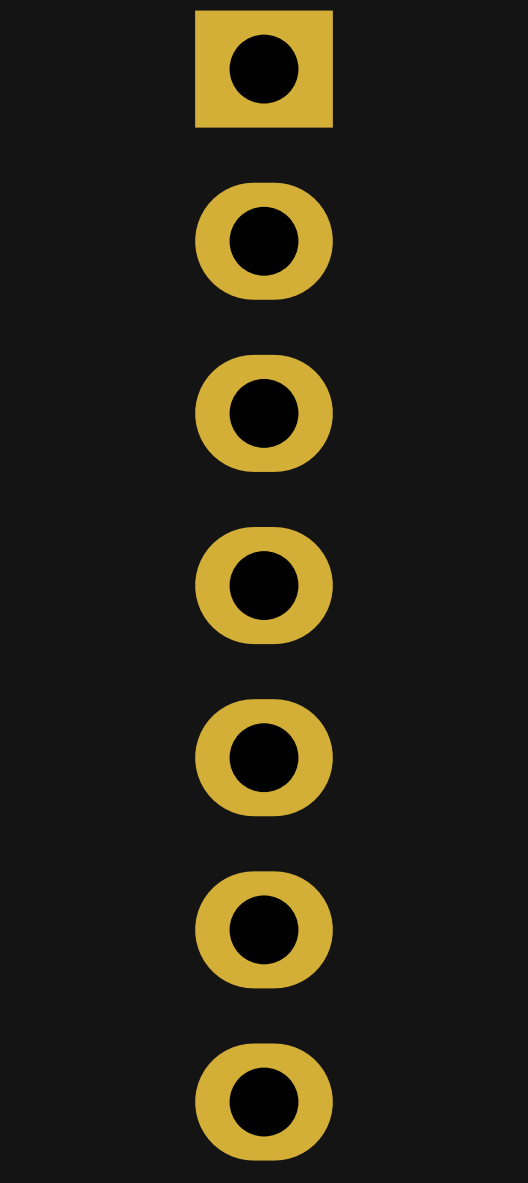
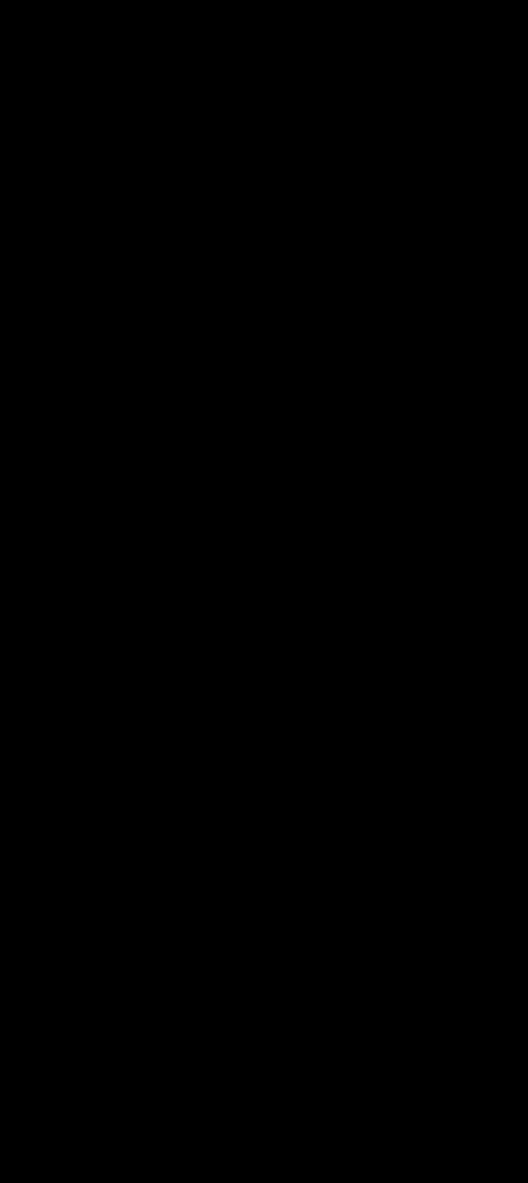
part: (264, 585) -> none

